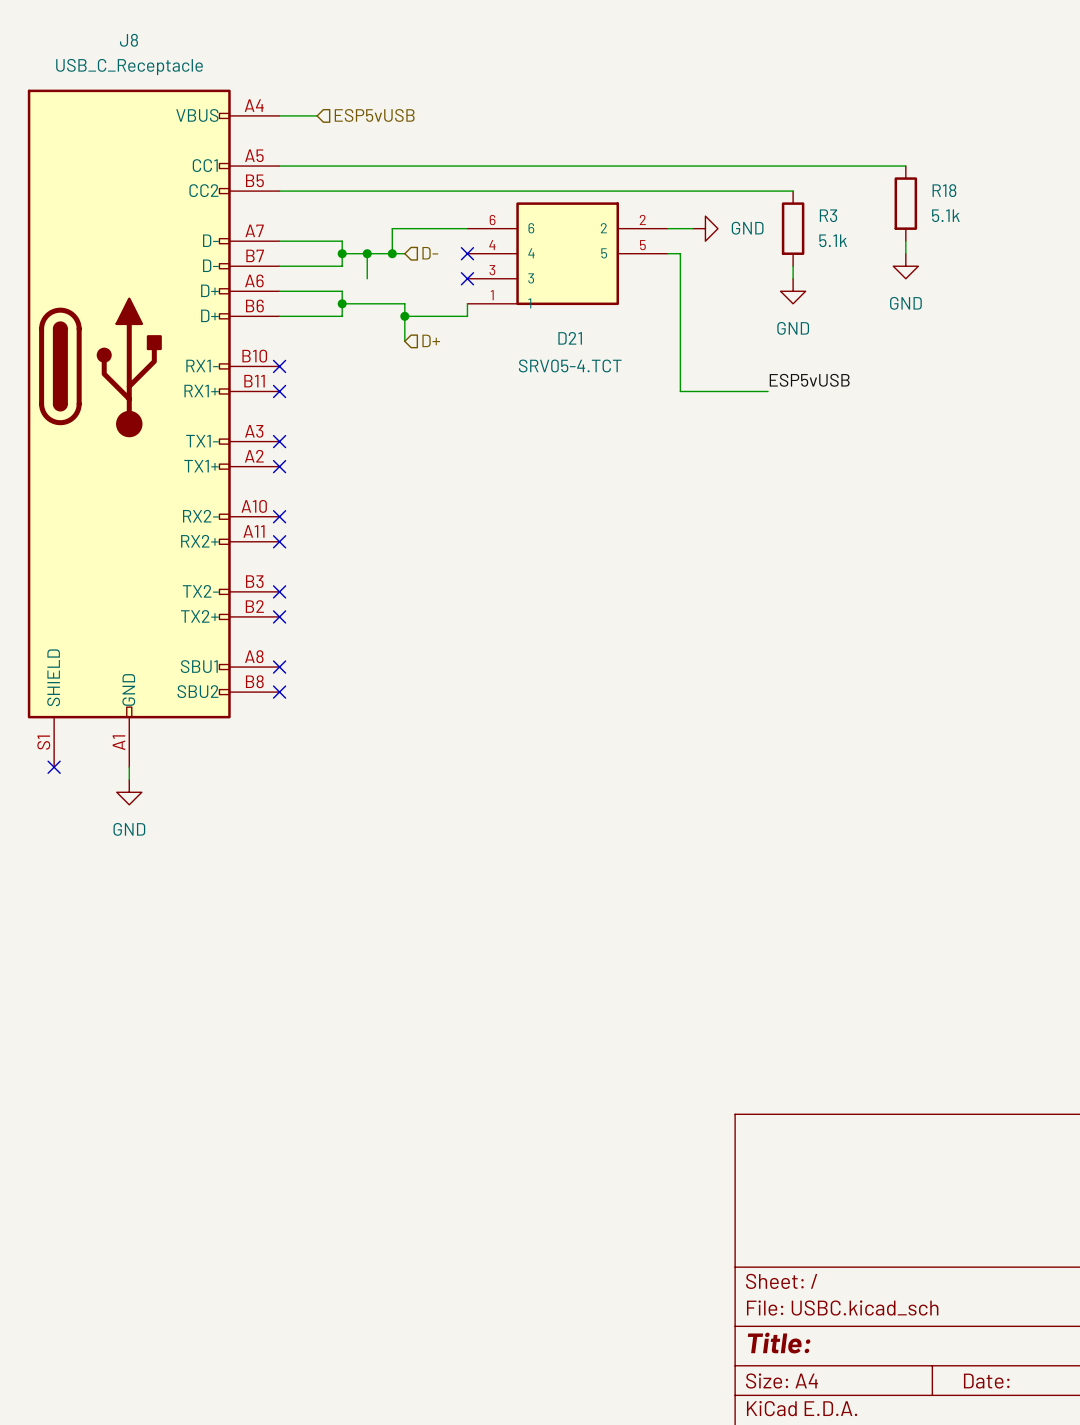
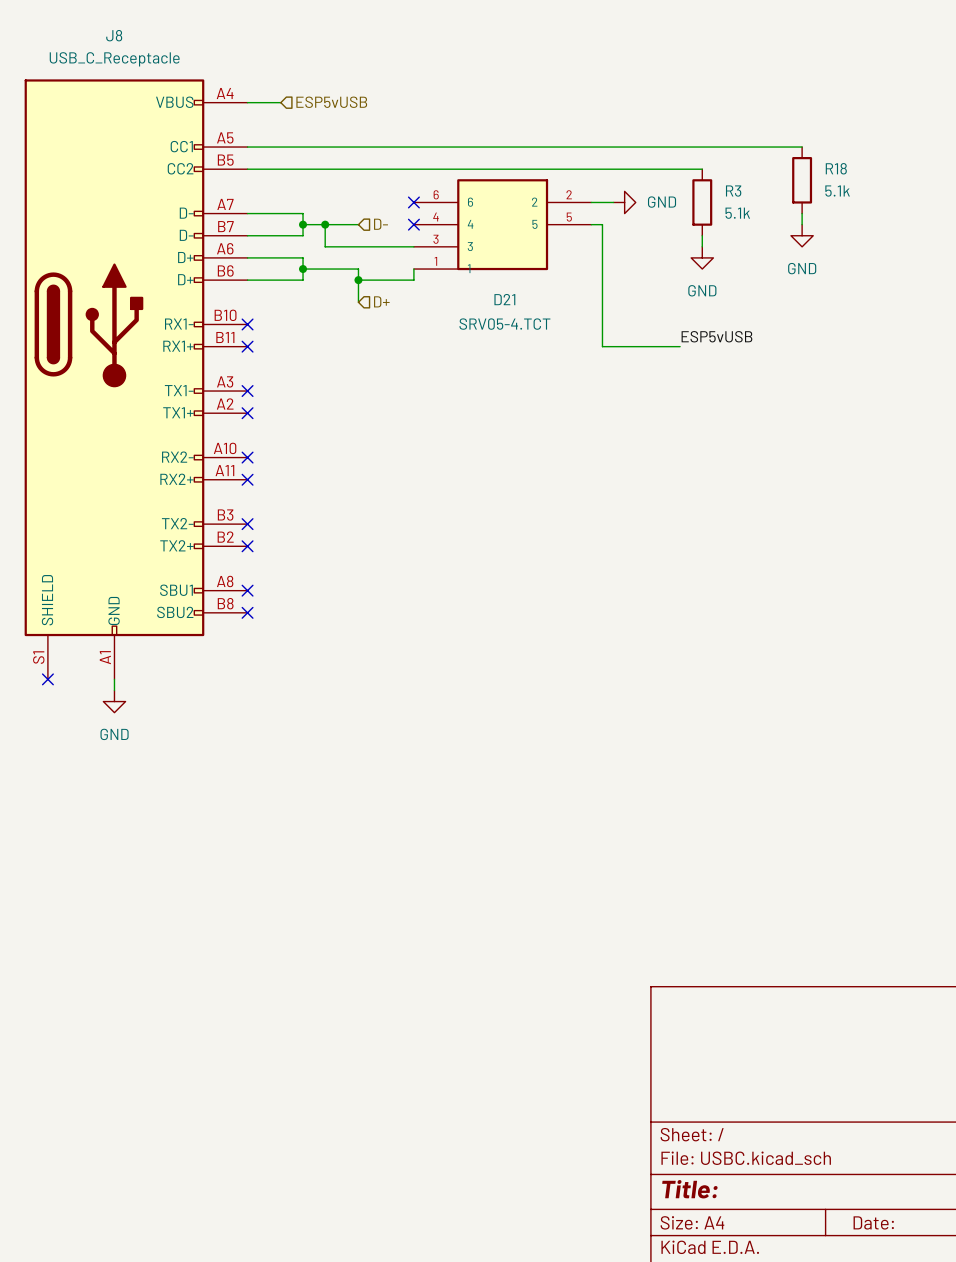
wire: (467, 228) (392, 228) (392, 253) -> none
junction: (392, 253) -> none
wire: none -> (325, 246) (413, 246)
no-connect mark position: (467, 278) -> (413, 202)

